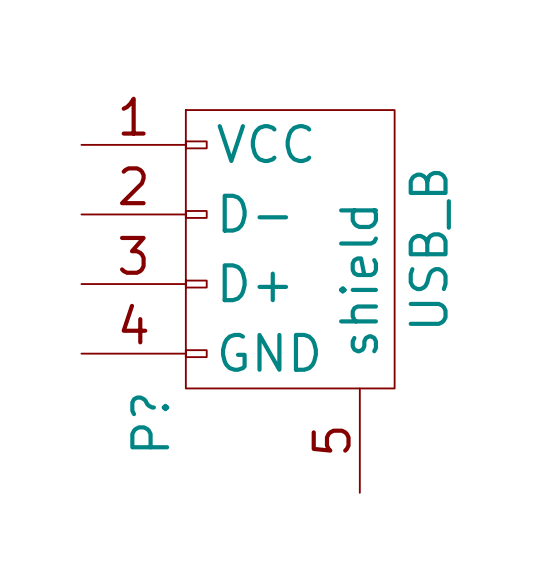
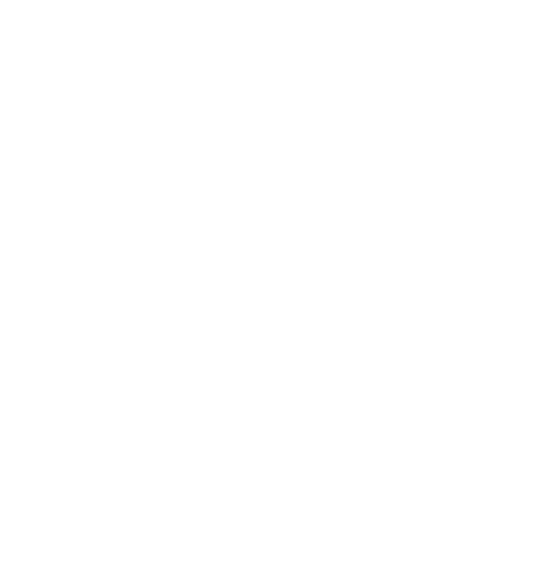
P?: USB_B (238, 301) -> none

